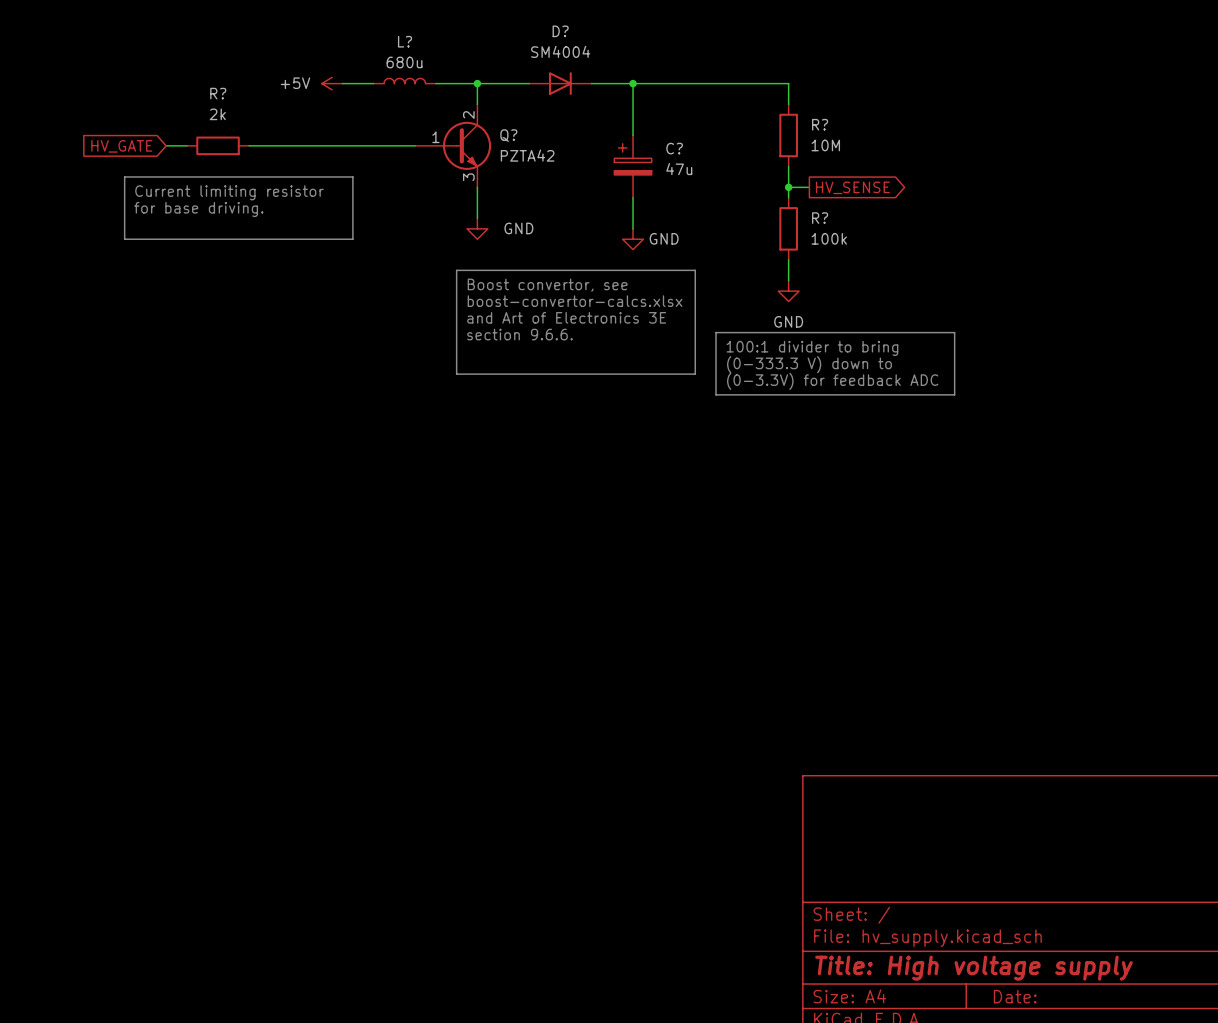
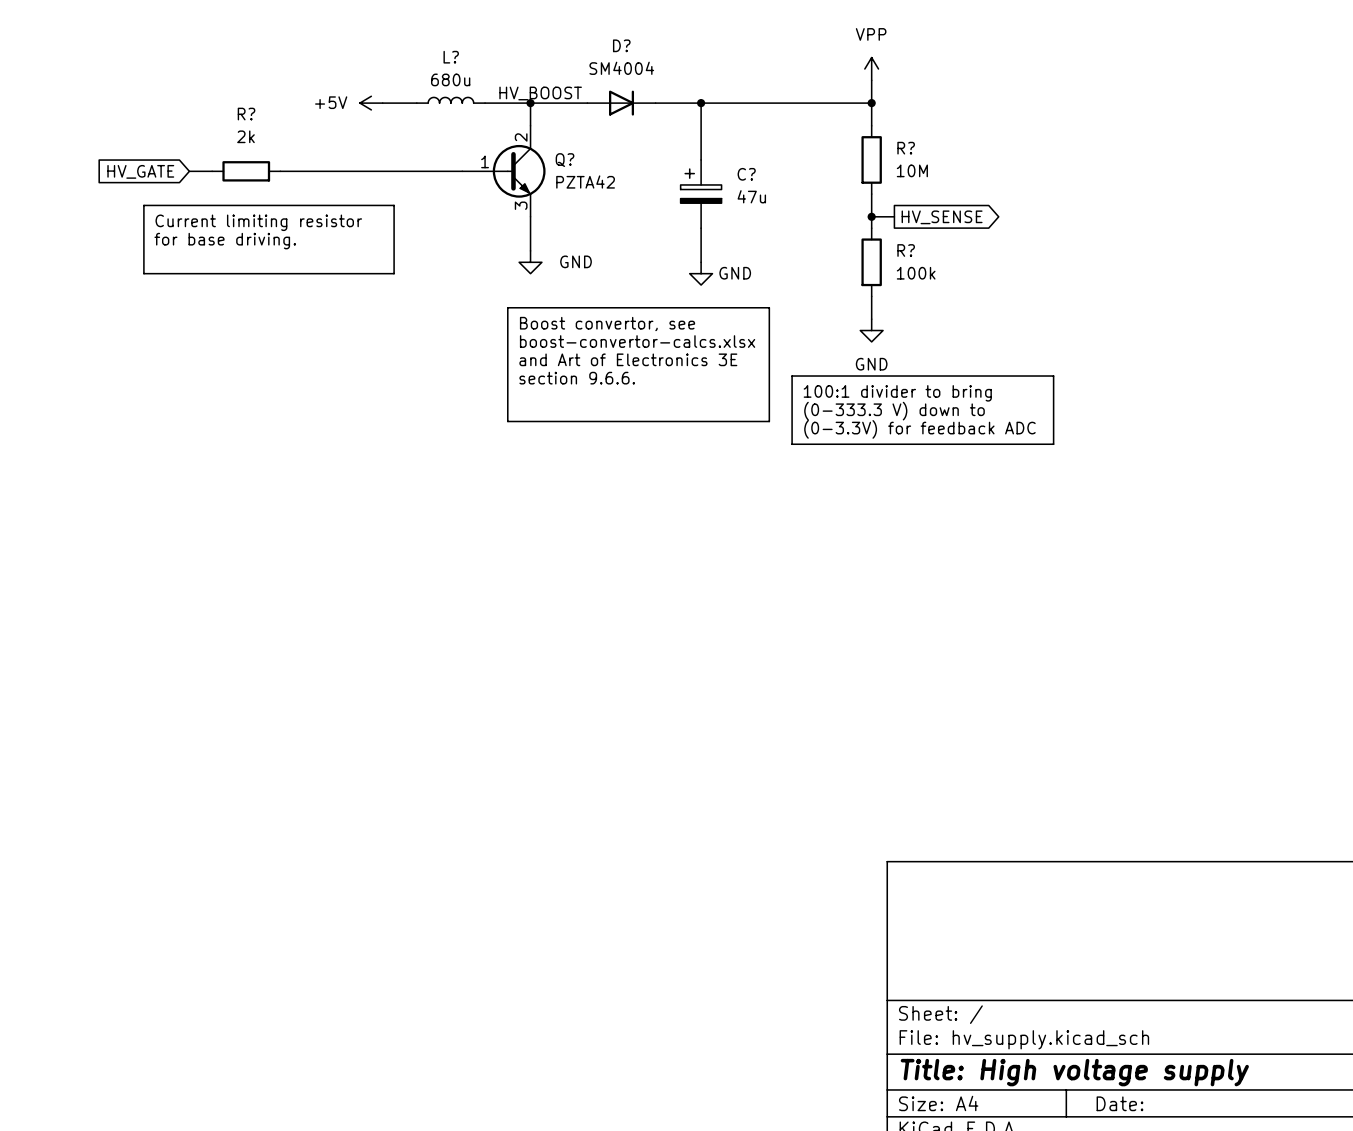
power symbol: none -> VPP (871, 68)
wire: none -> (871, 80) (871, 103)
label: none -> HV_BOOST (540, 93)
junction: none -> (871, 103)

